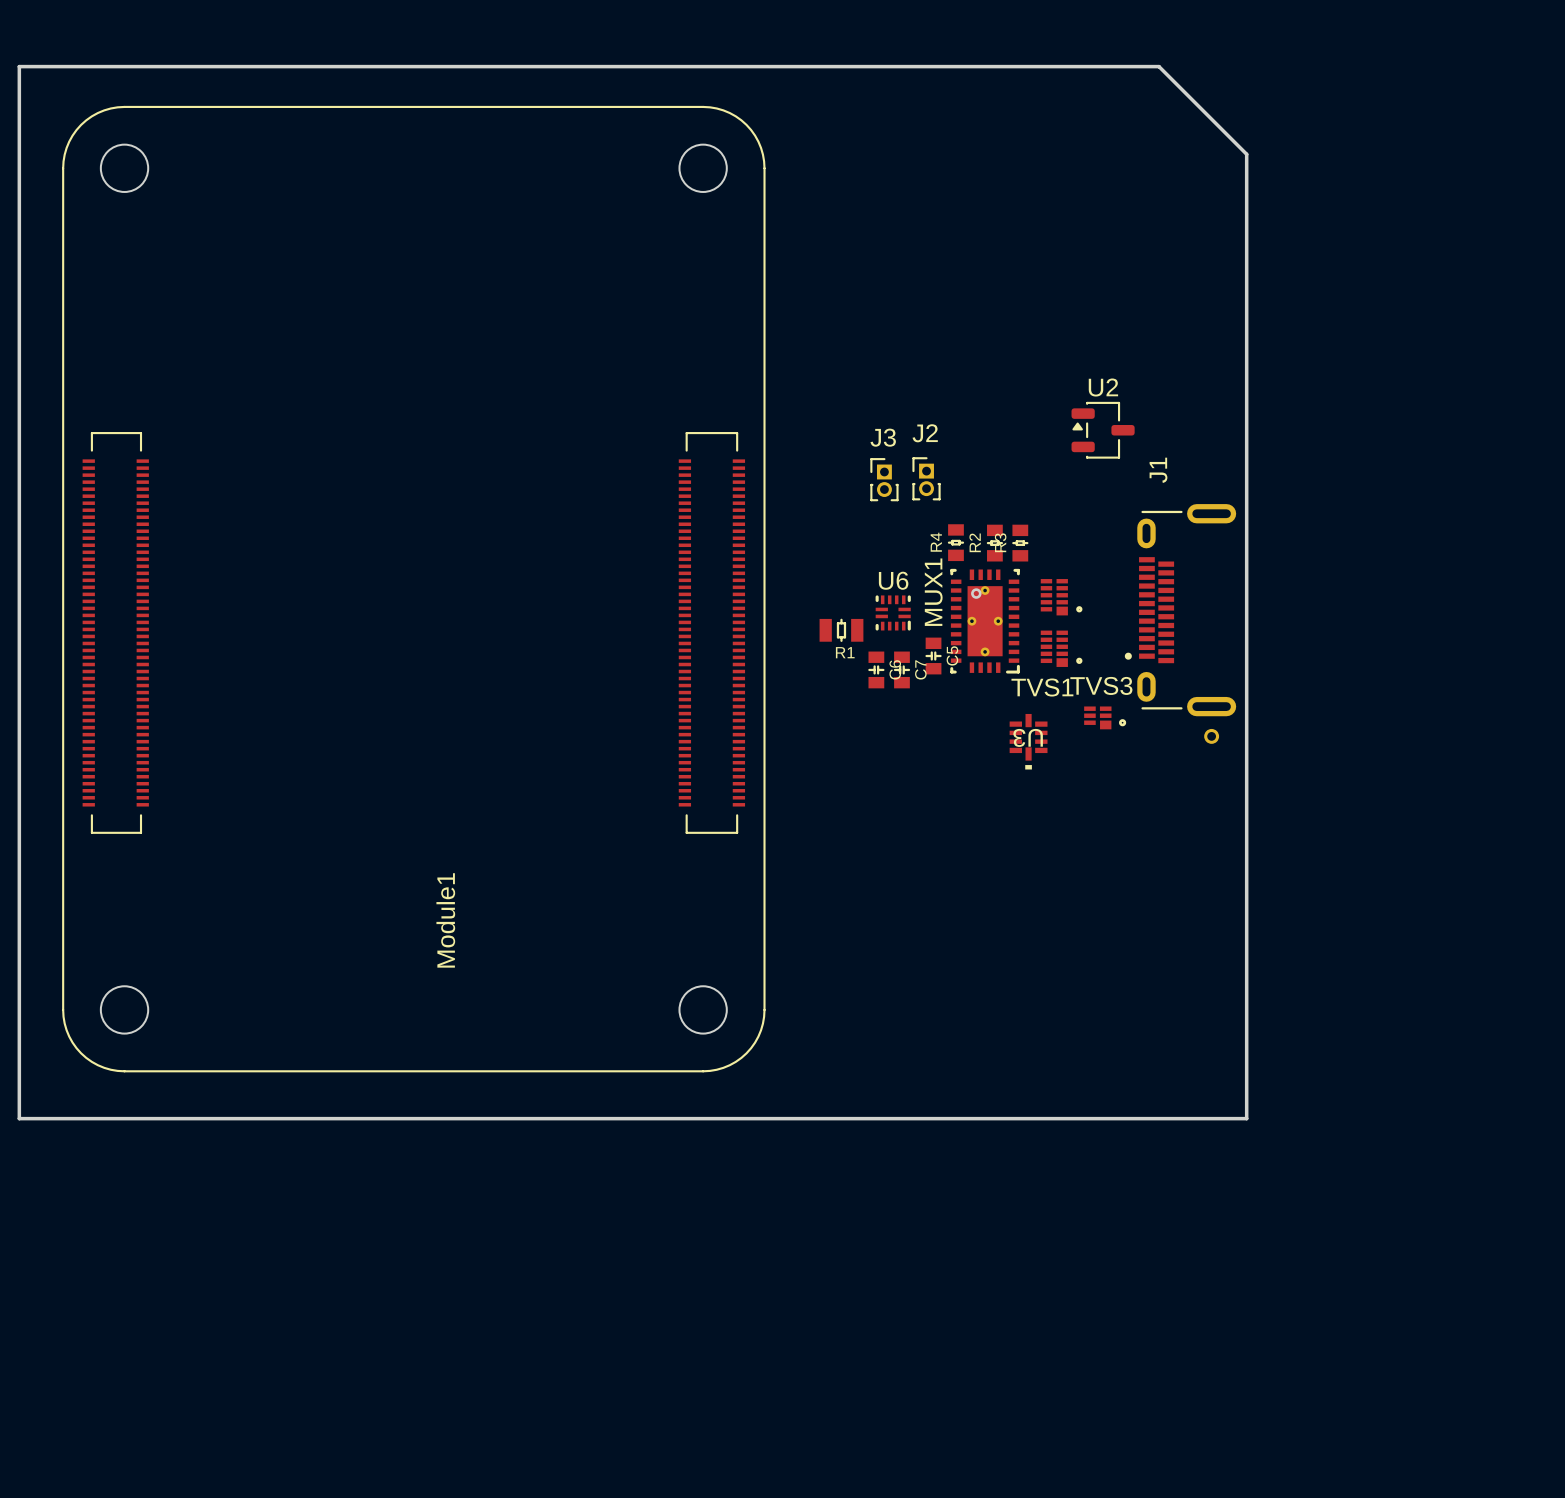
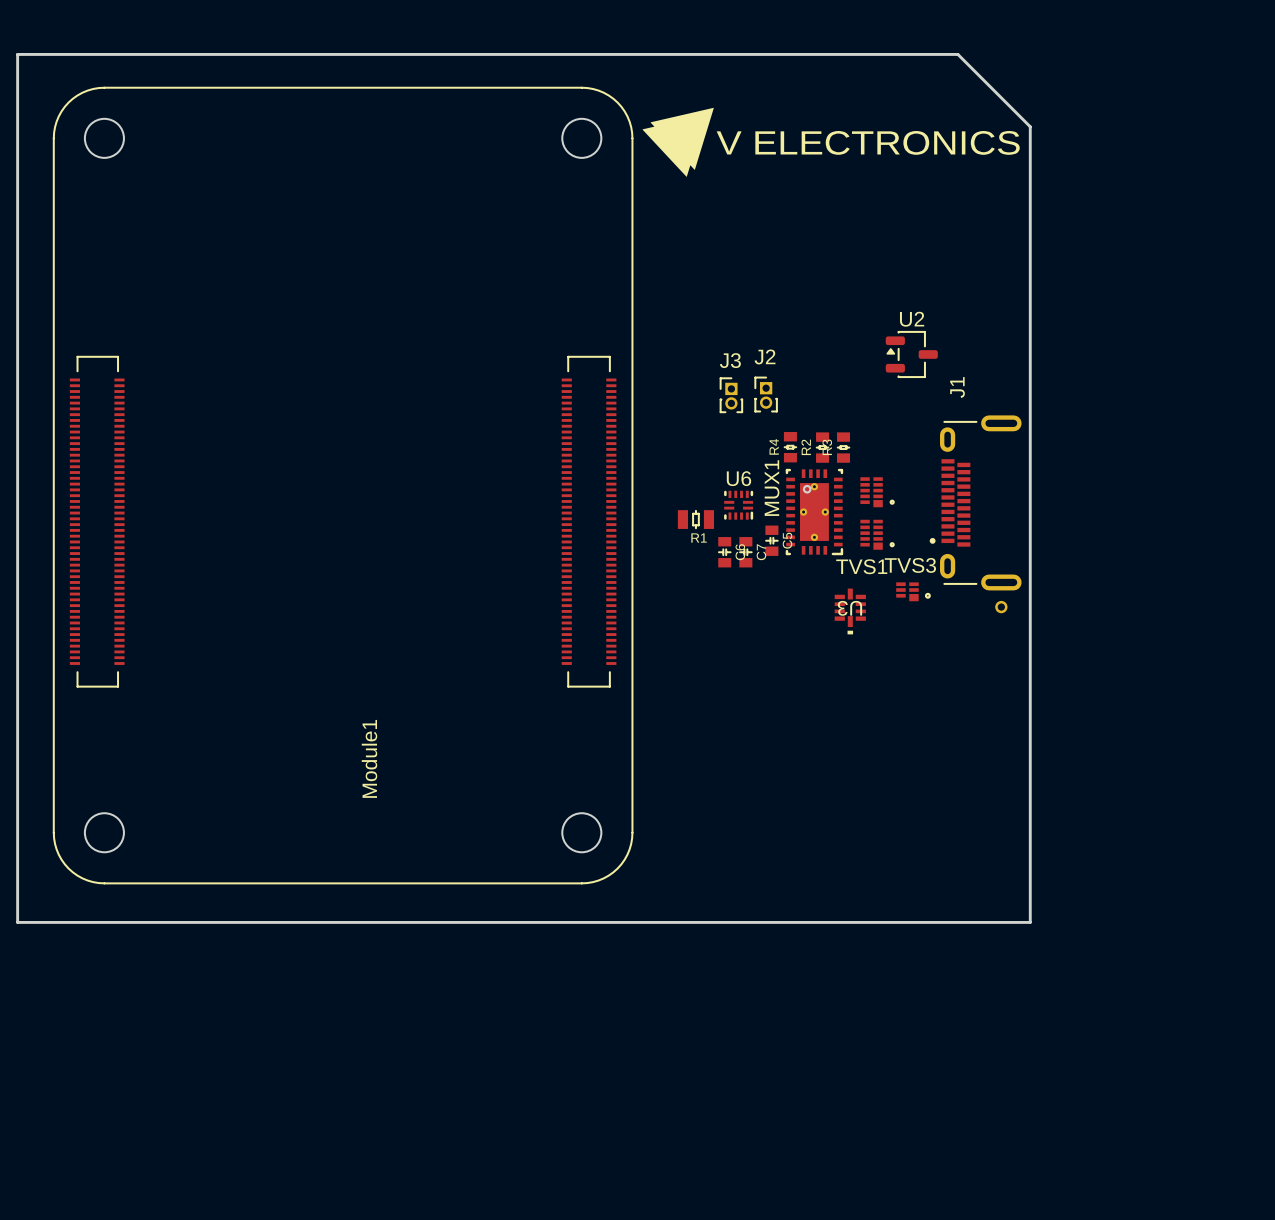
drawing: none -> [642, 107, 714, 177]
text: none -> V ELECTRONICS (868, 142)

